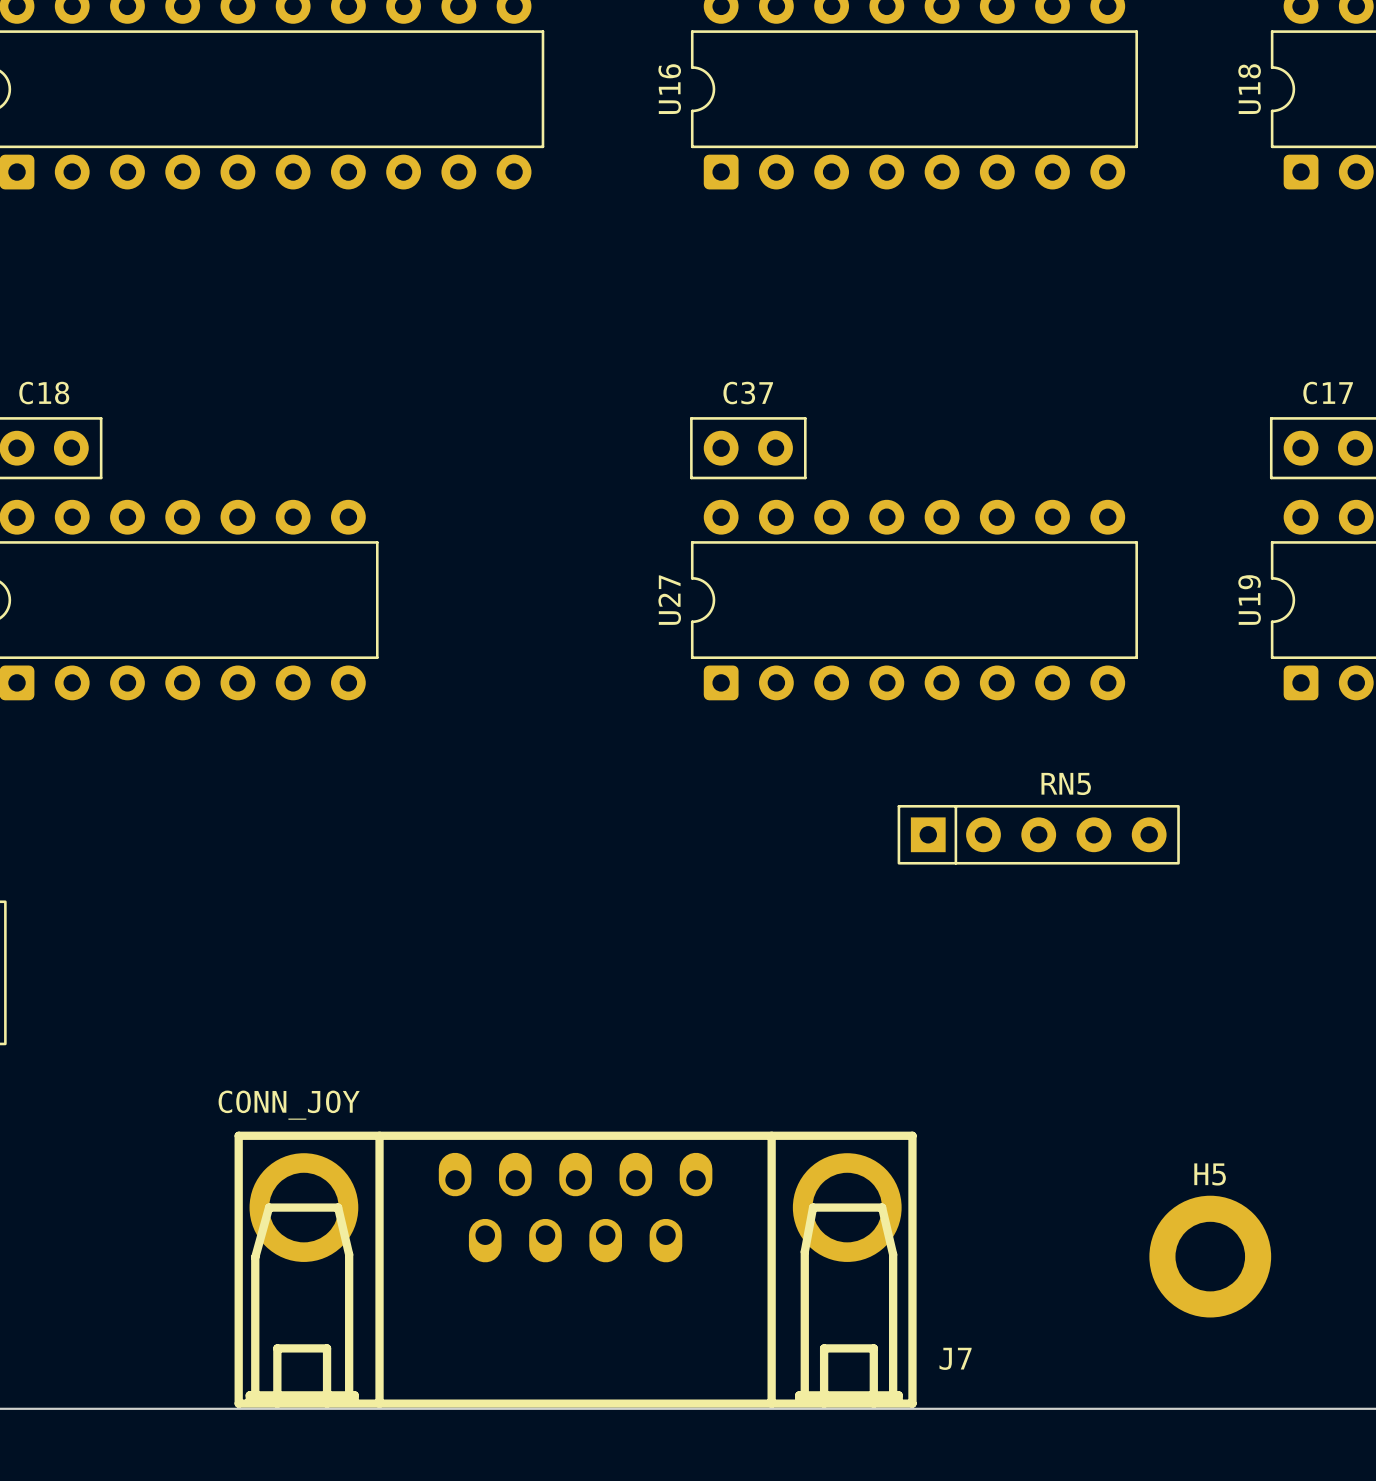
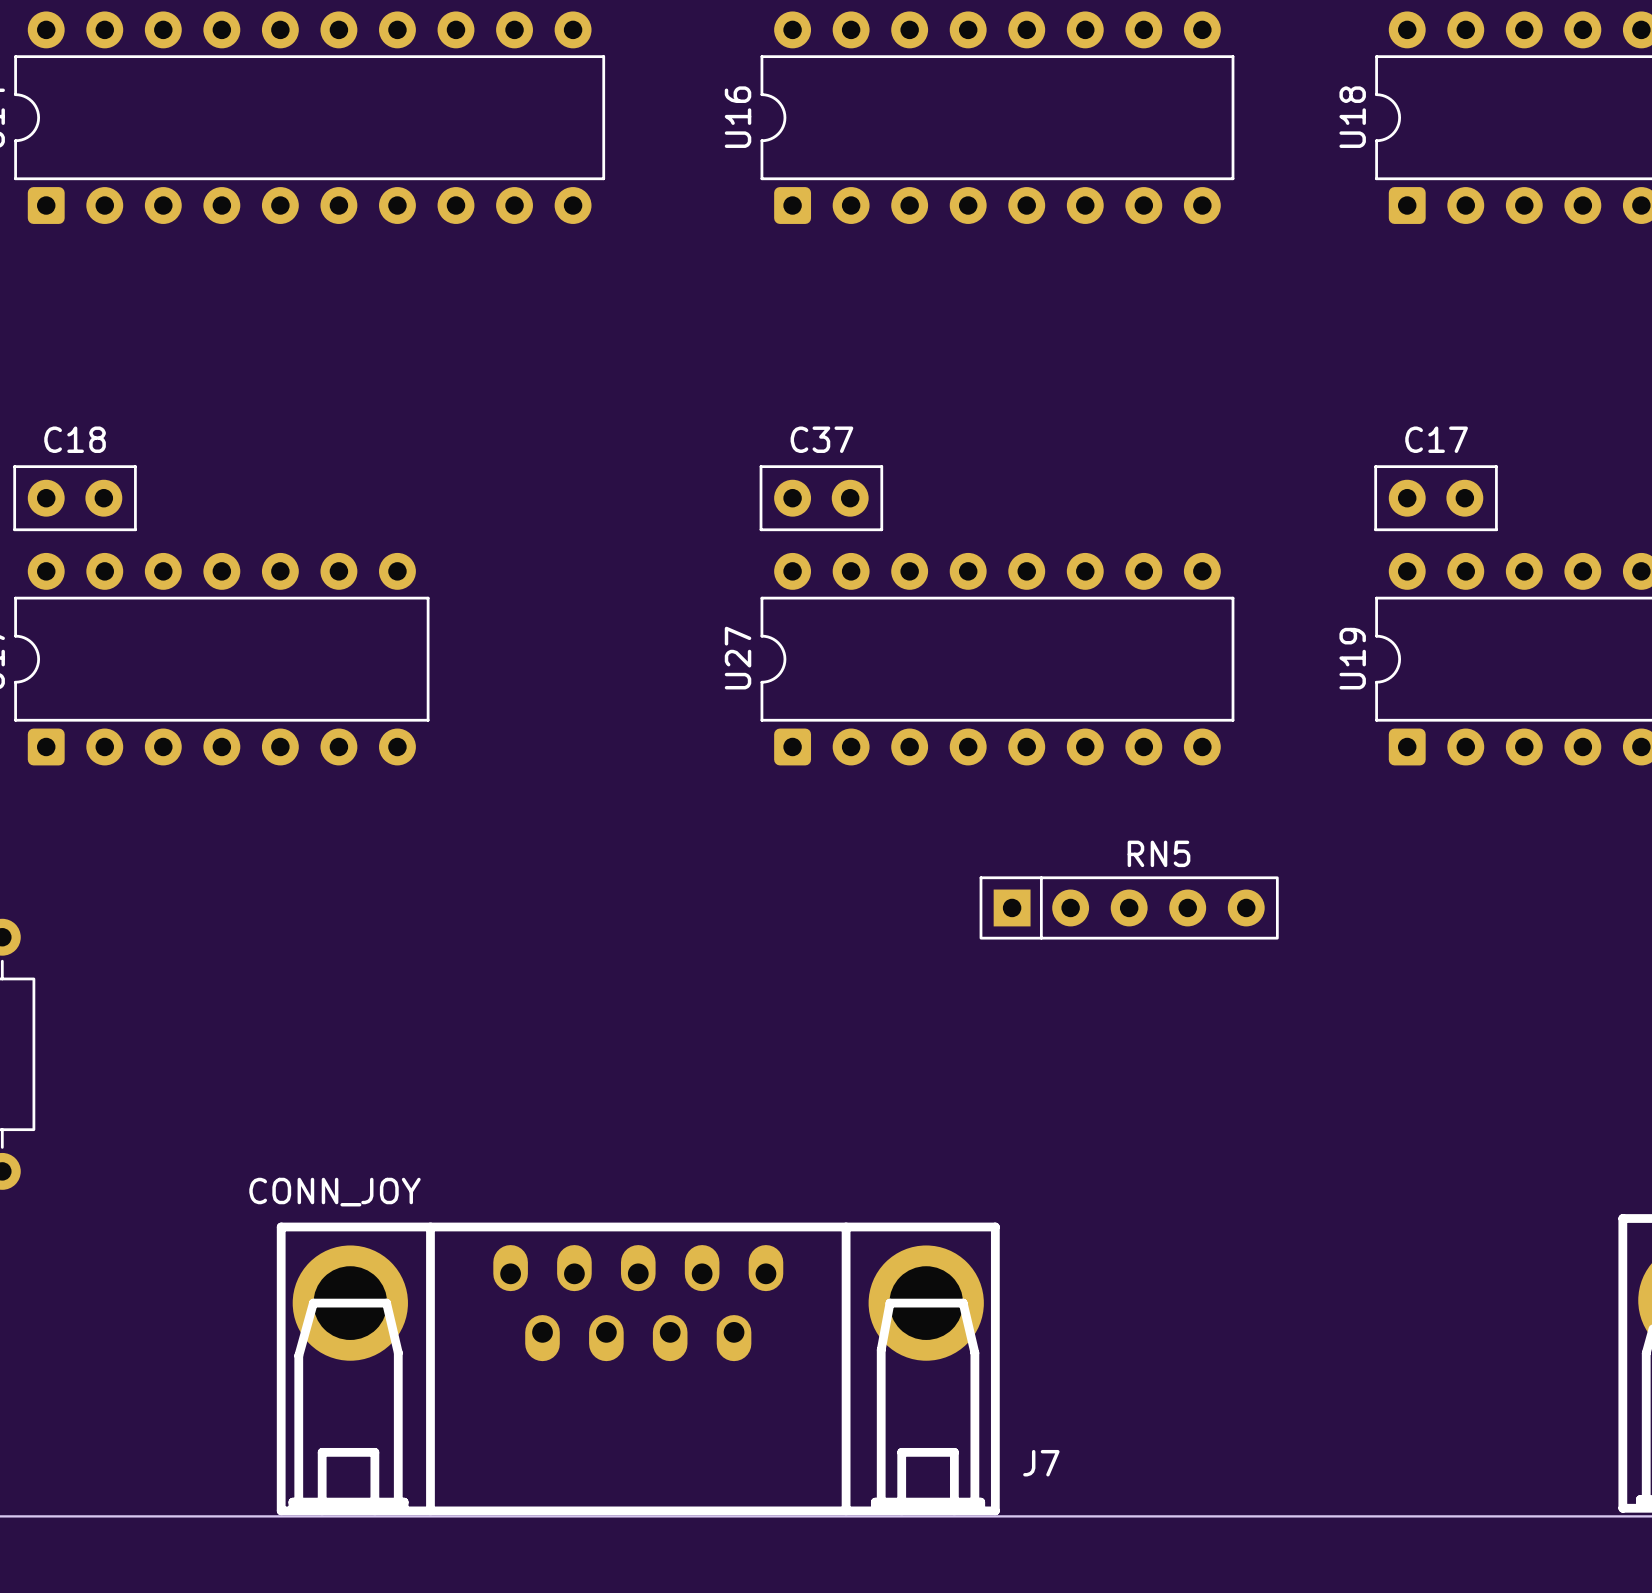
H5: (1210, 1256) -> none

